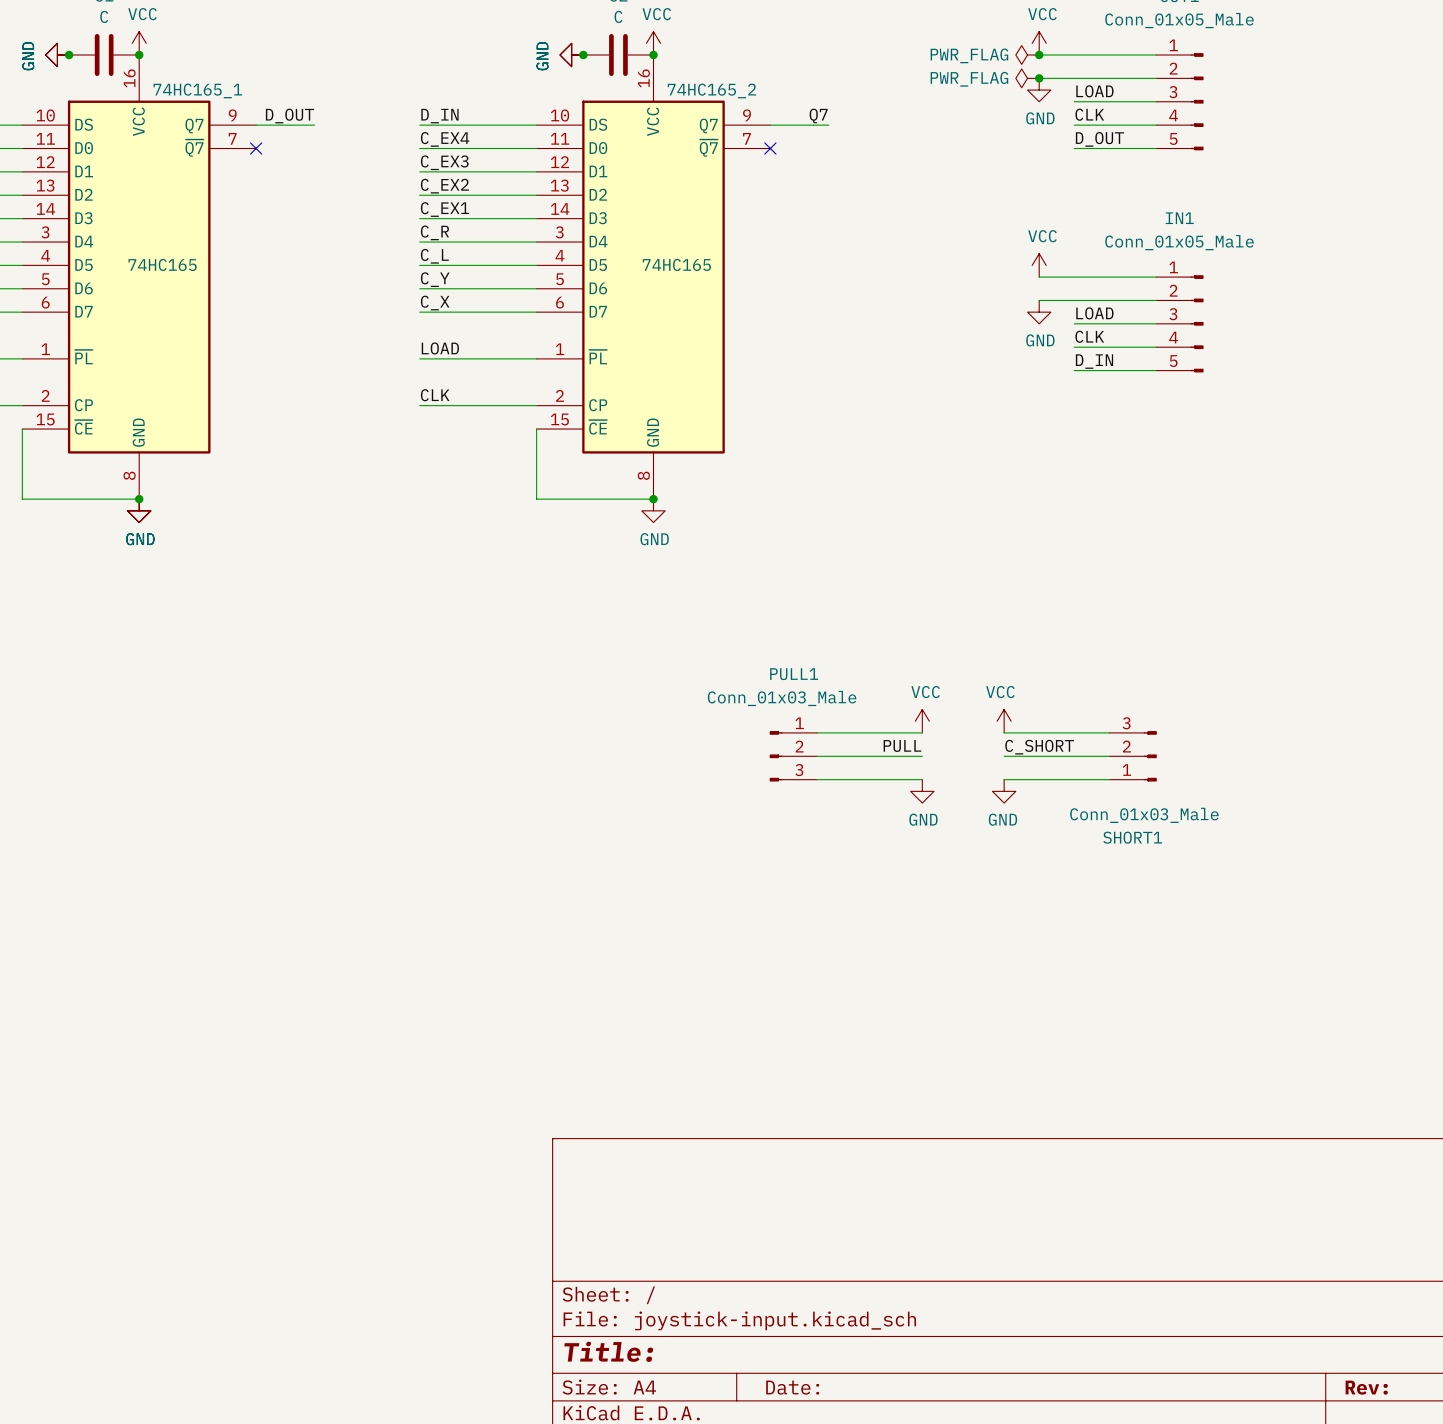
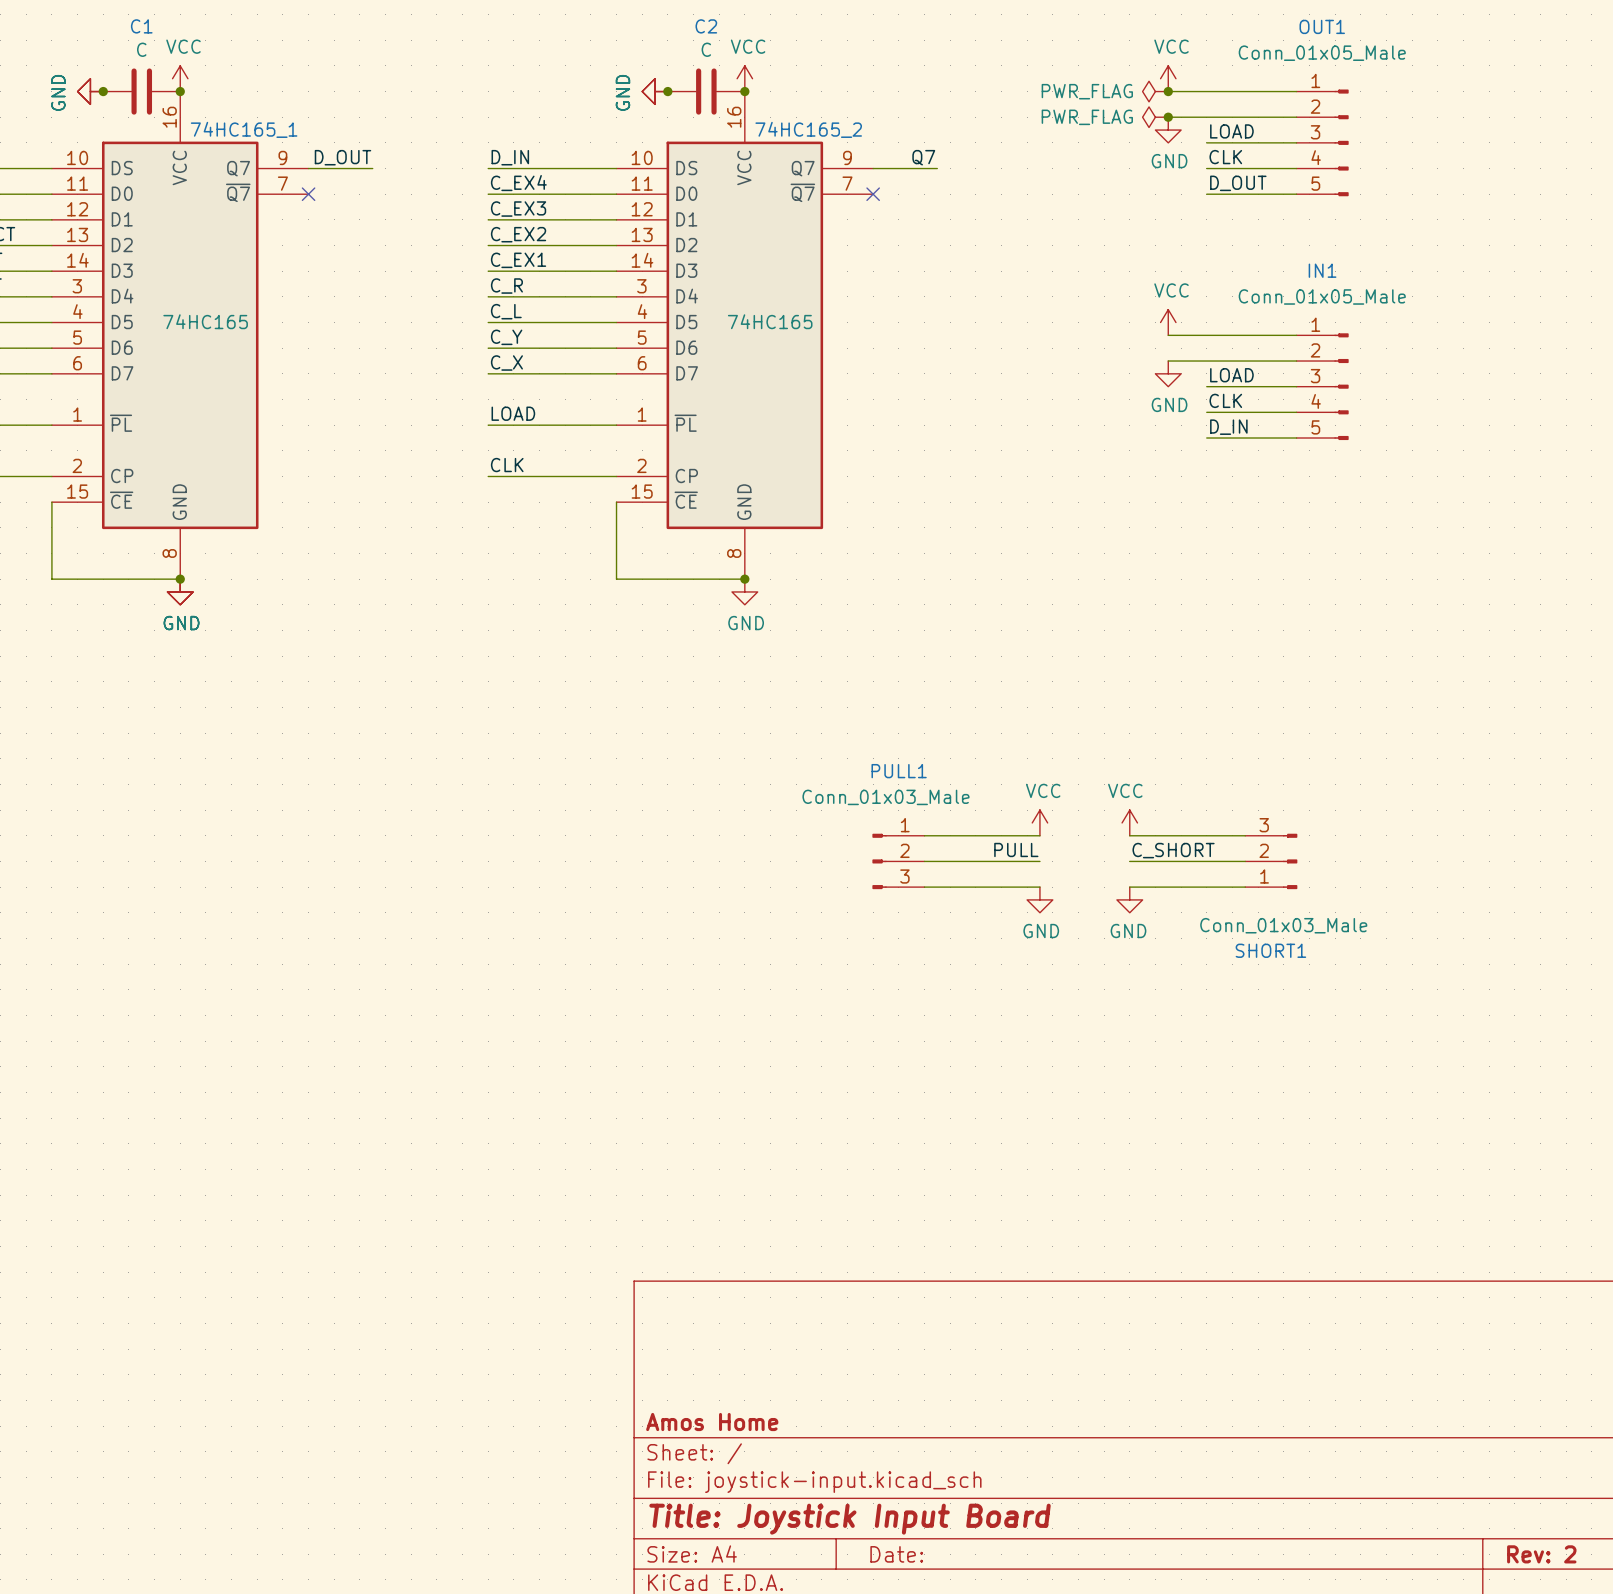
title block: none -> Amos Home (712, 1422)
title block: Title: (608, 1351) -> Title: Joystick Input Board (850, 1519)
title block: Rev: (1366, 1387) -> Rev: 2 (1541, 1554)

